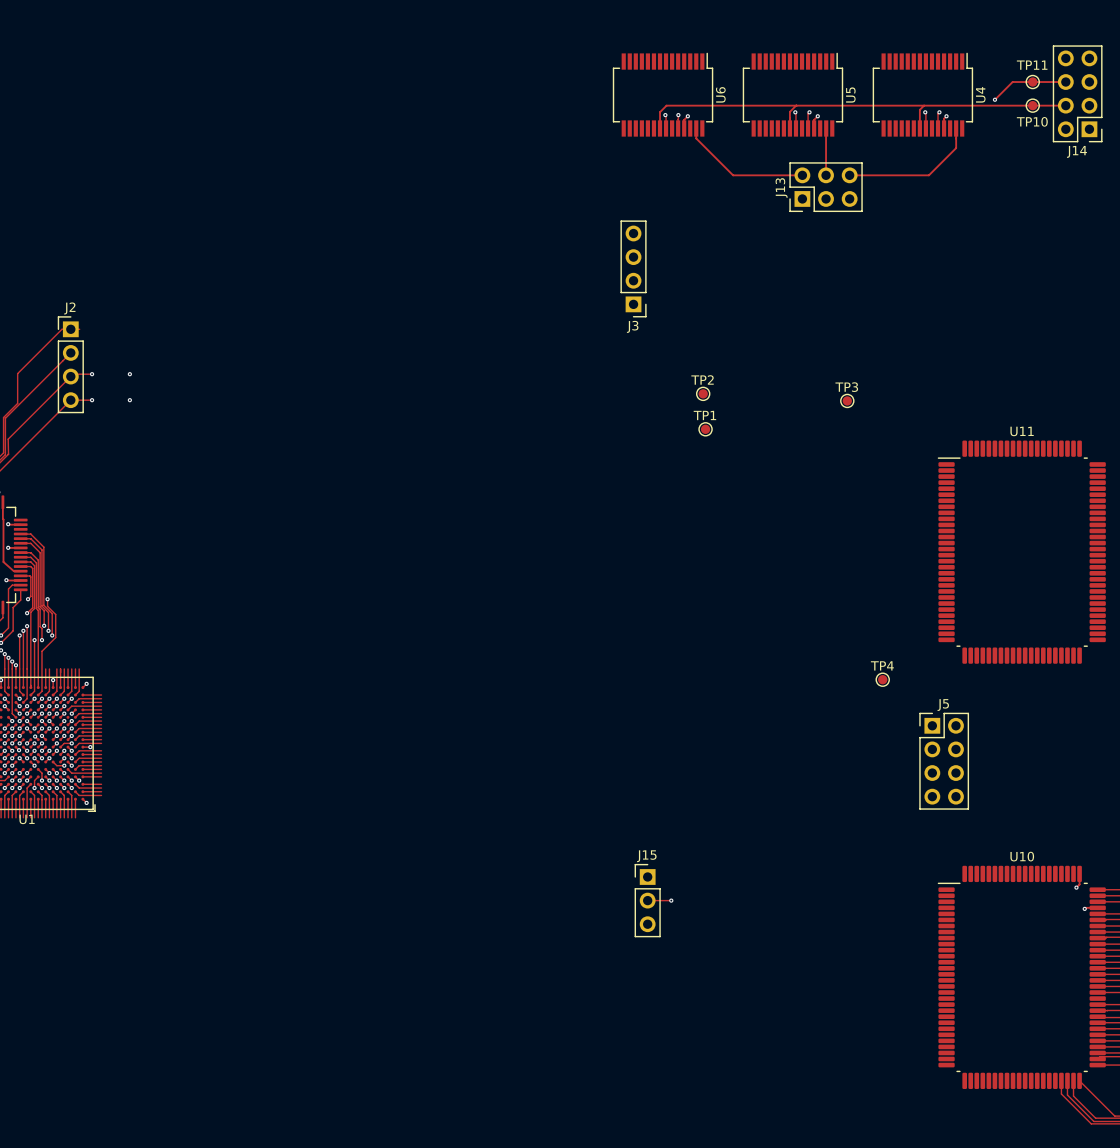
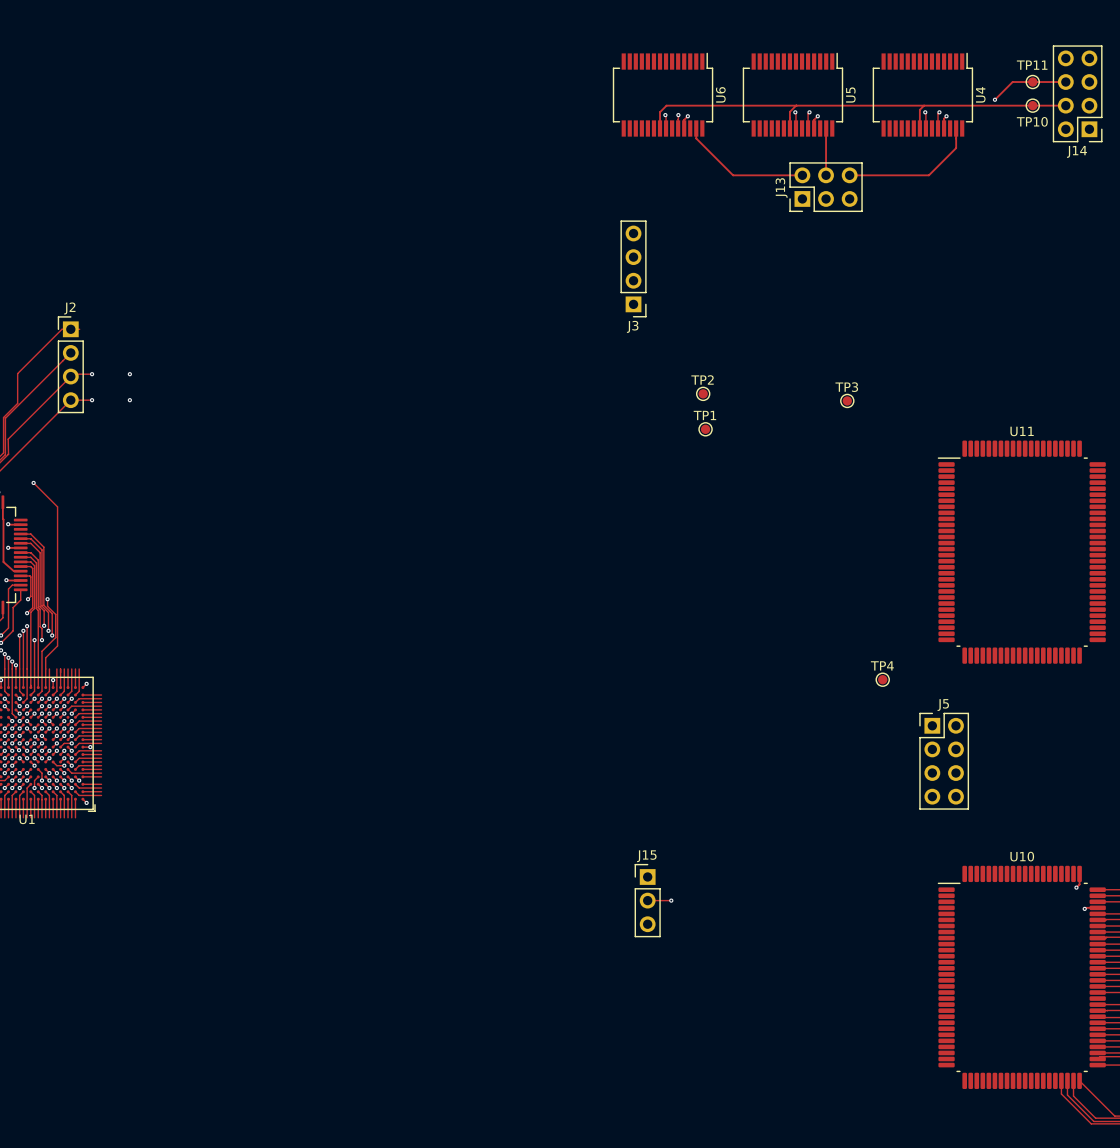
track: none -> (33, 482) (57, 506) (57, 645) (45, 657) (45, 668)
via: none -> (33, 482)

